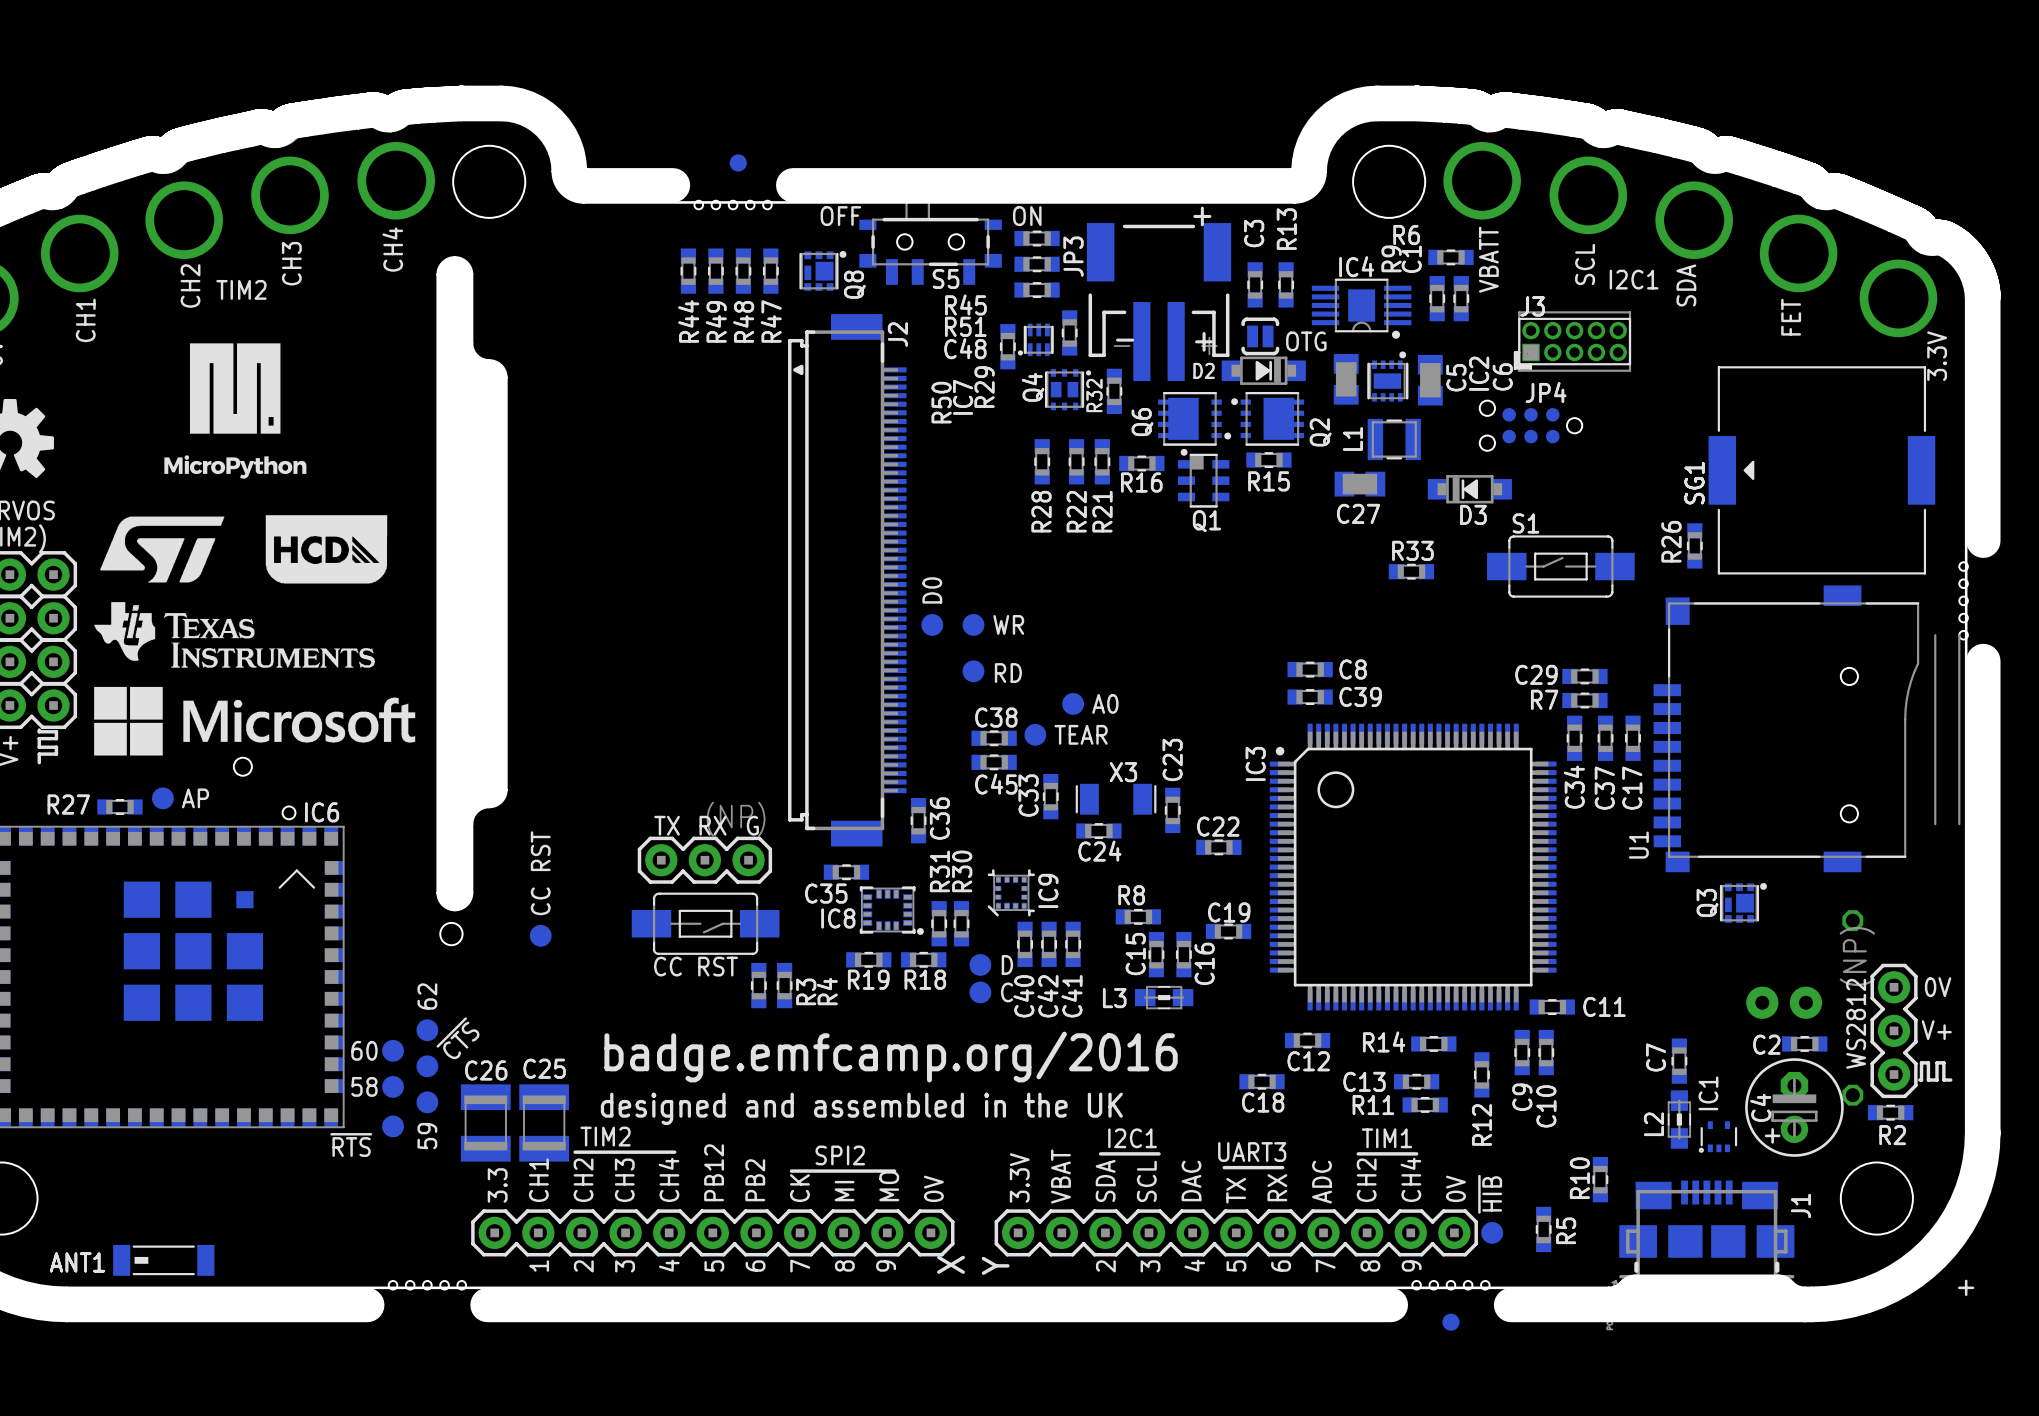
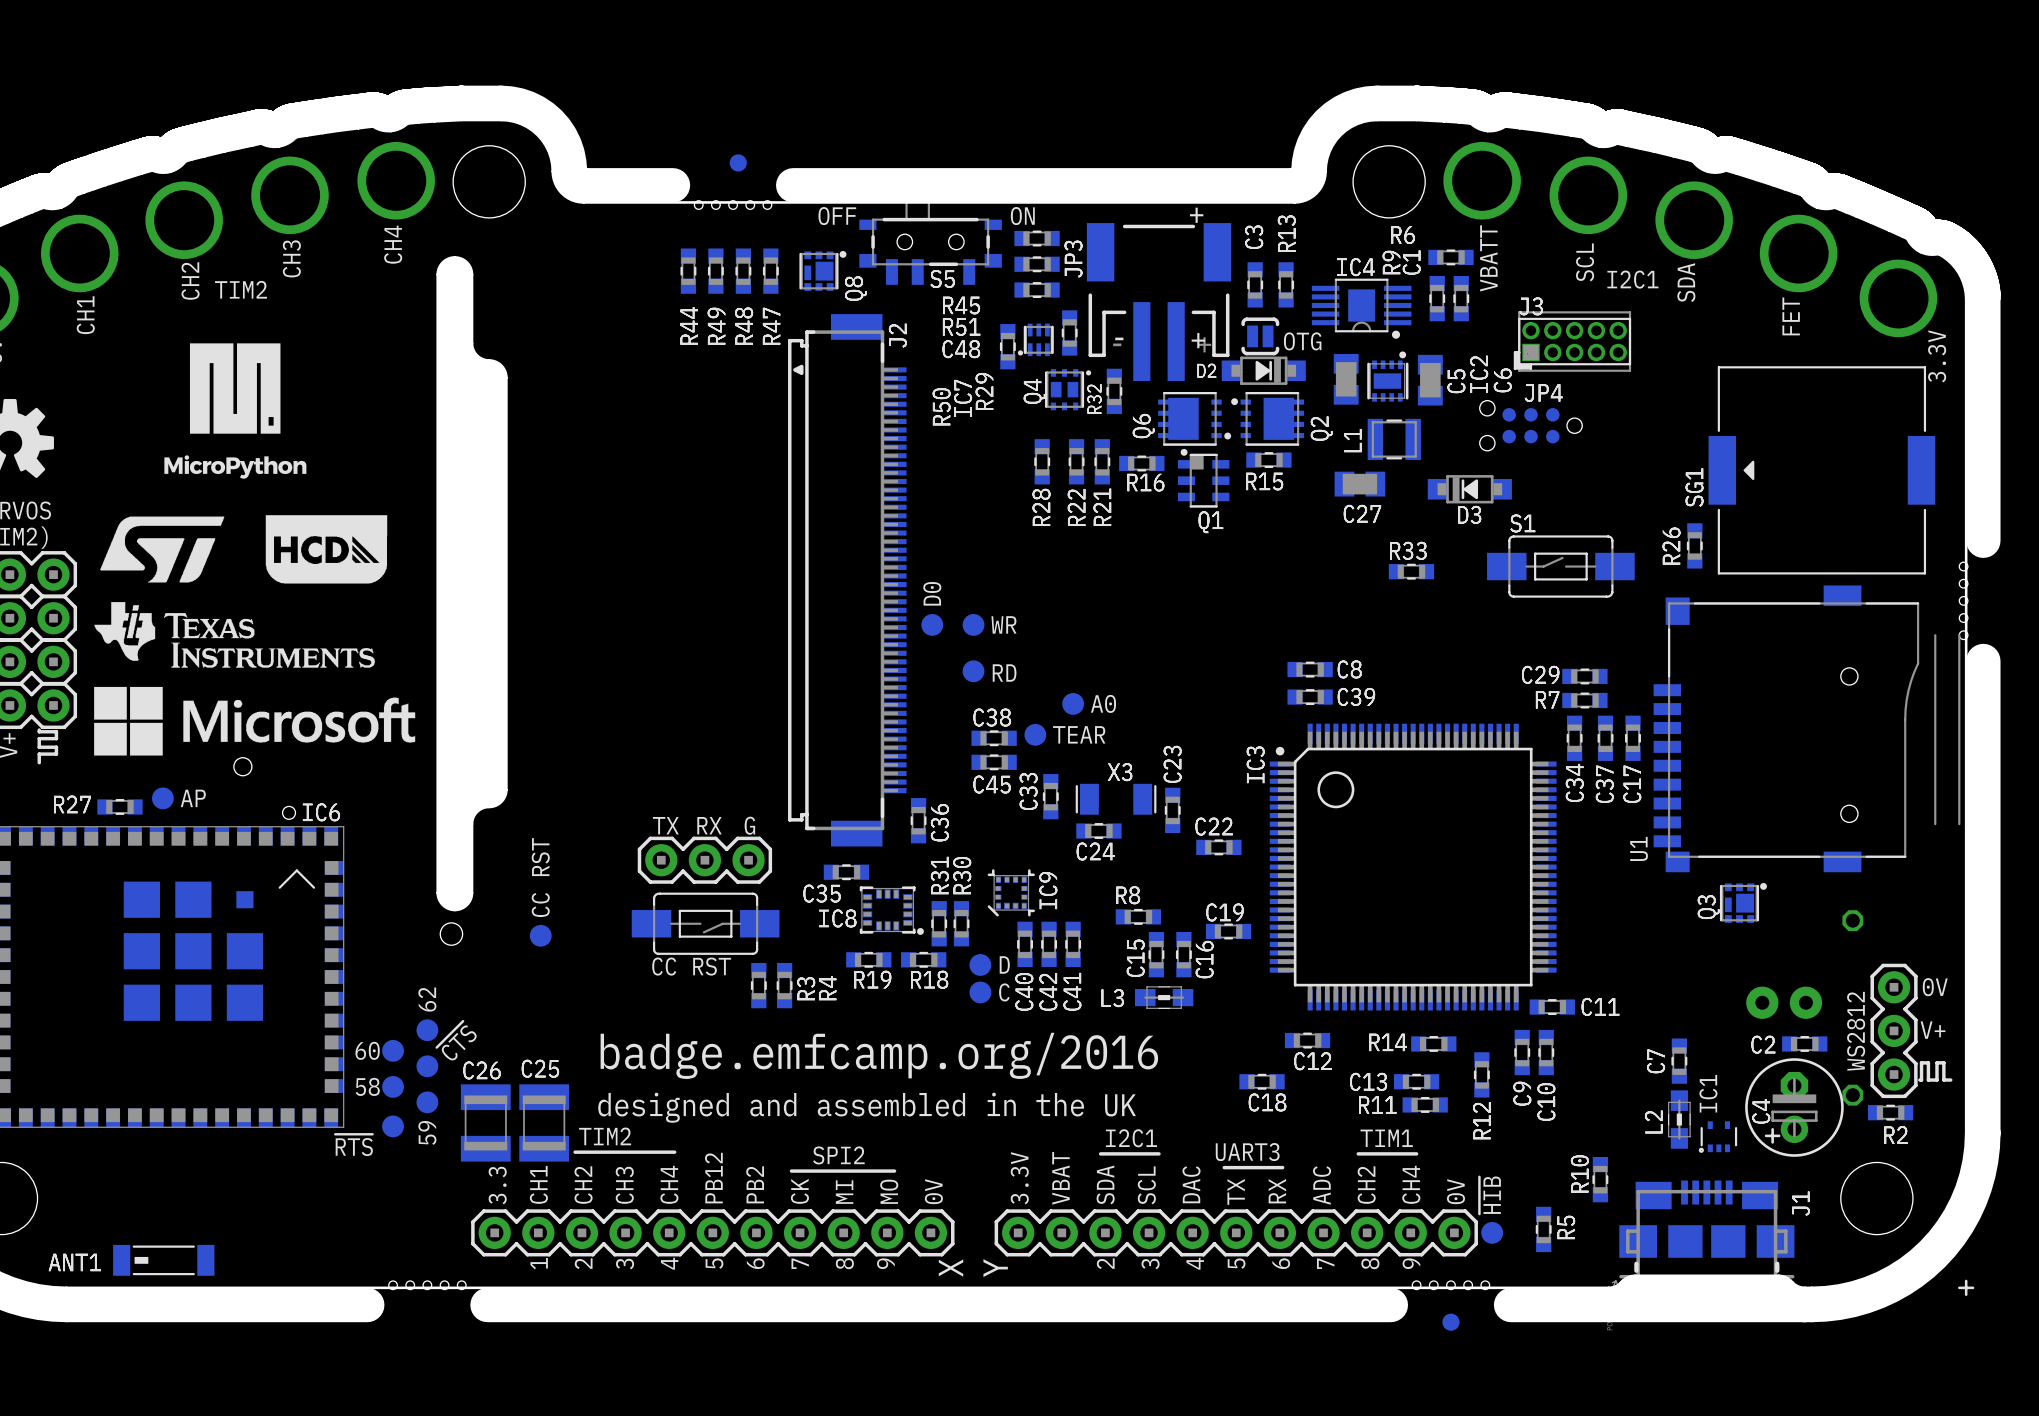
part value: (NP) (736, 819) -> none
part value: (NP) (1857, 956) -> none

